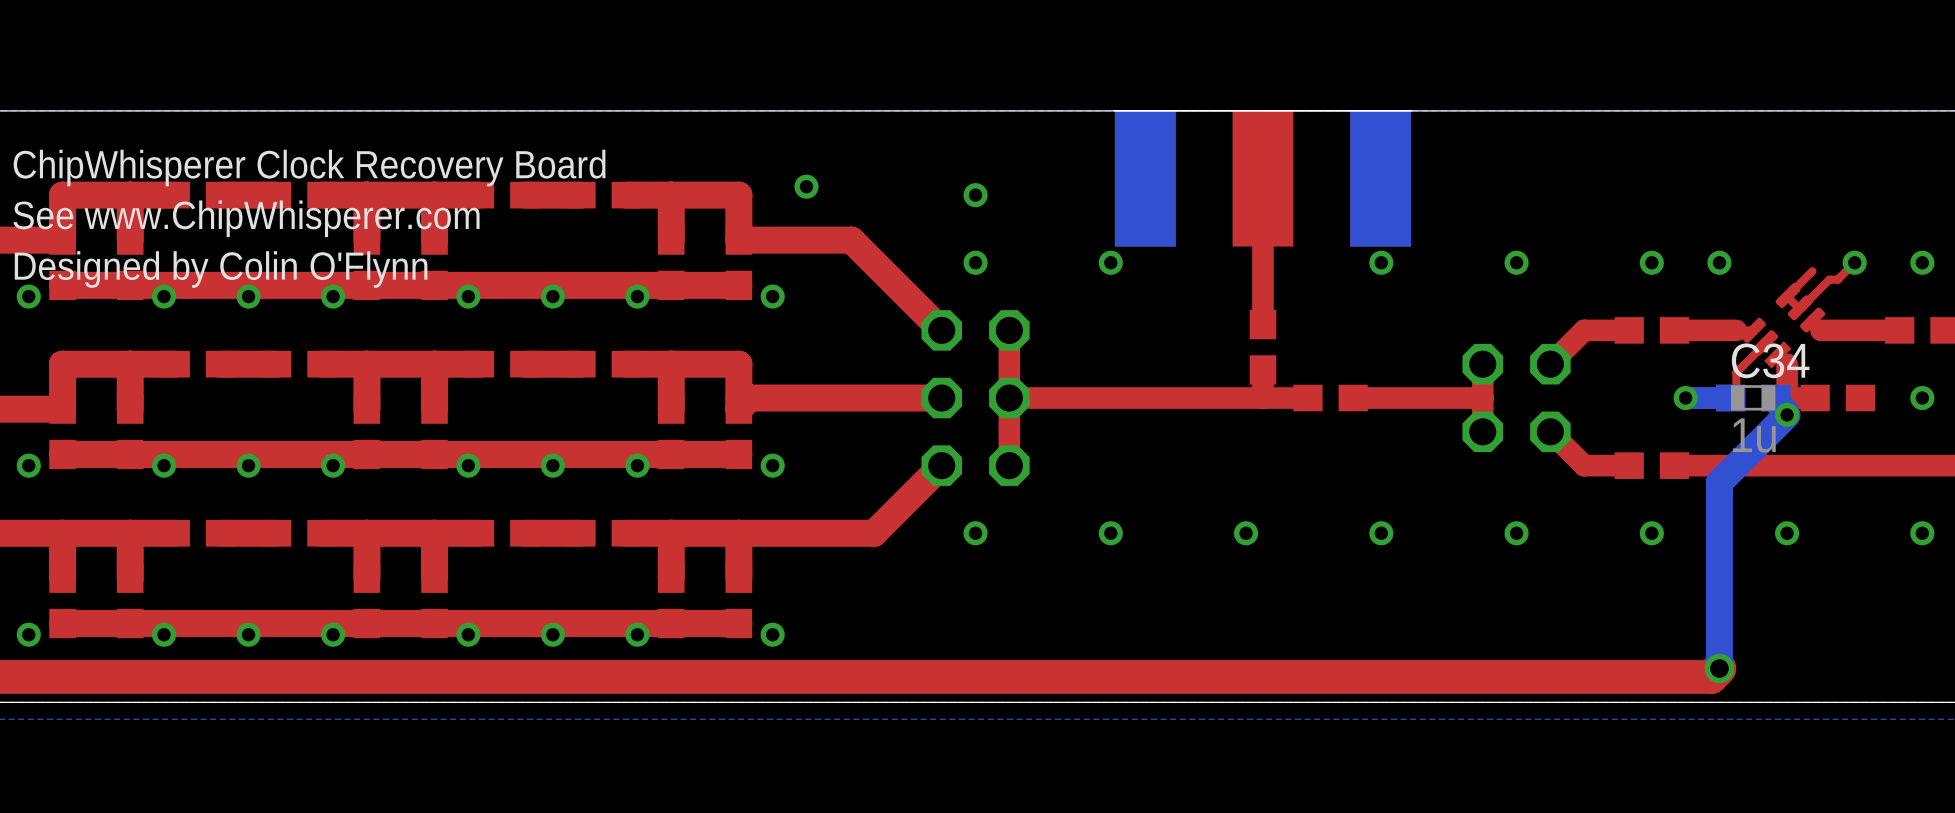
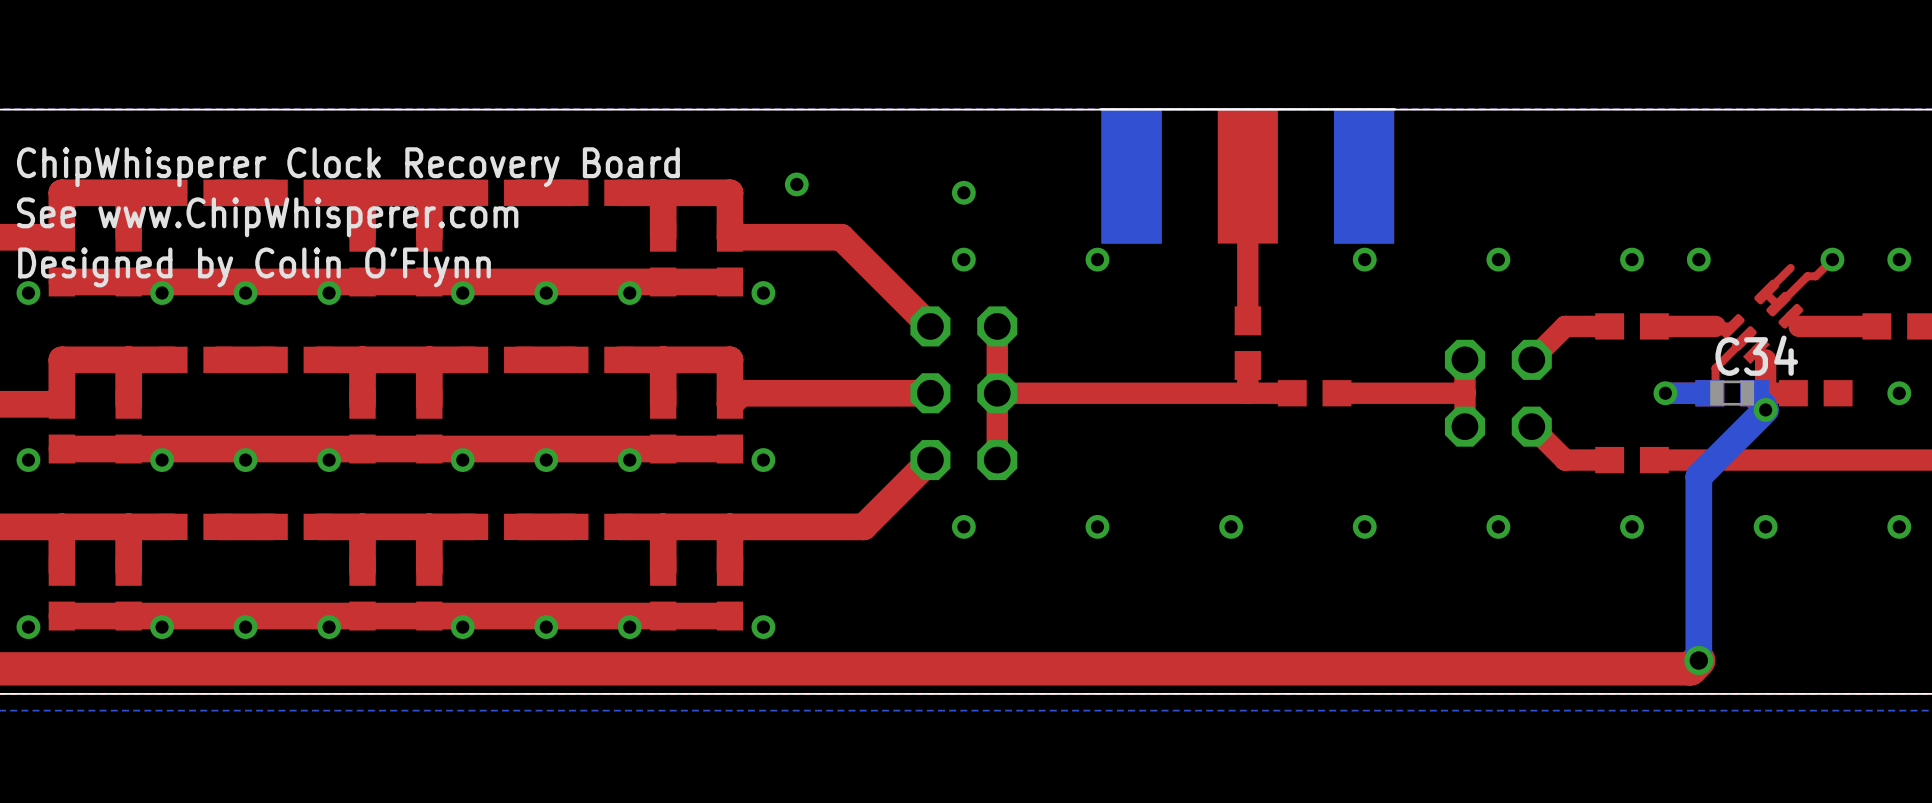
C34 value: 1u (1754, 435) -> none

